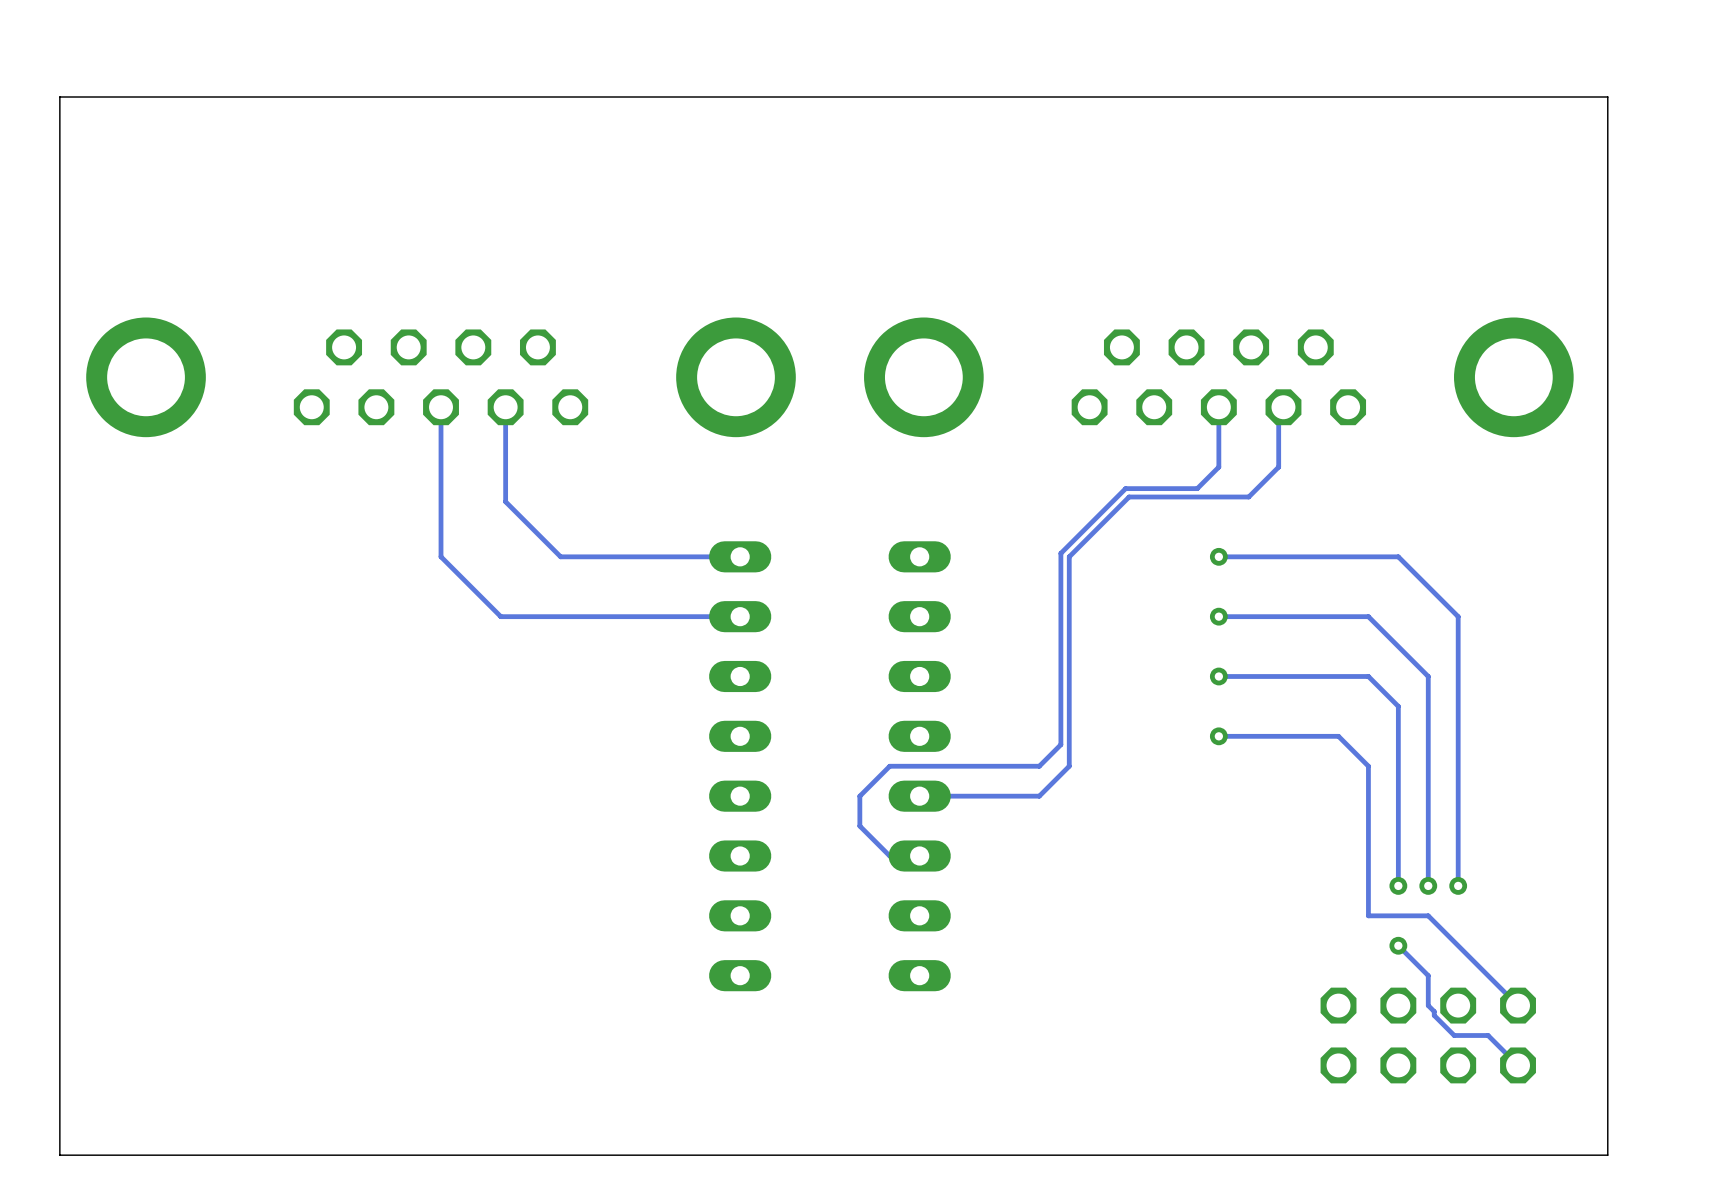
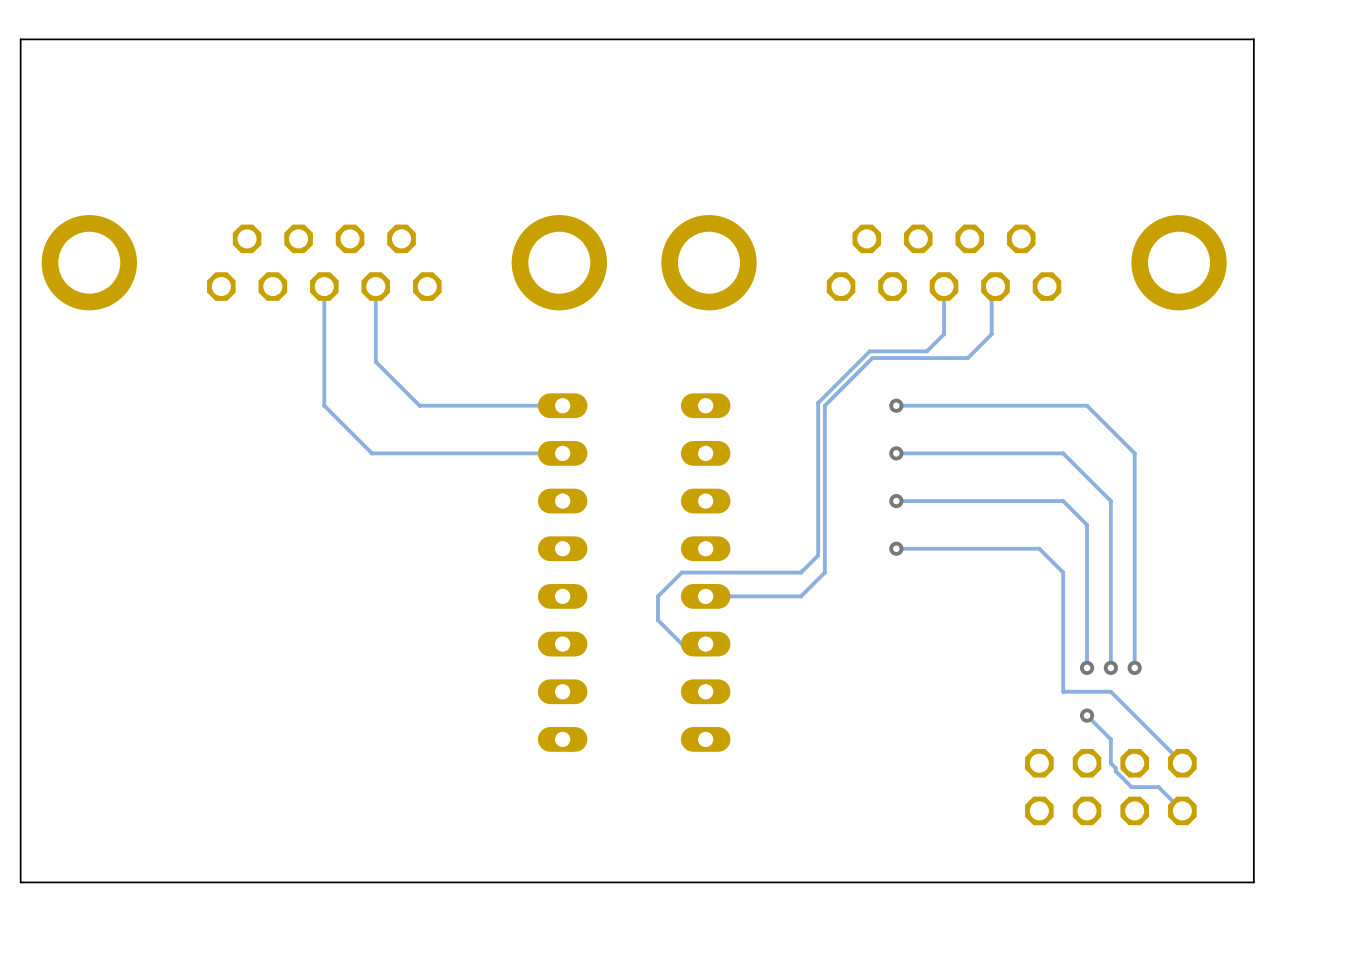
via: none -> (896, 405)
track: none -> (944, 405) (896, 405)
via: (1218, 556) -> none
via: none -> (896, 453)
track: none -> (944, 453) (896, 453)
via: (1218, 616) -> none
via: none -> (896, 501)
track: none -> (944, 501) (896, 501)
via: (1218, 676) -> none
via: none -> (896, 548)
track: none -> (944, 548) (896, 548)
via: (1218, 736) -> none

